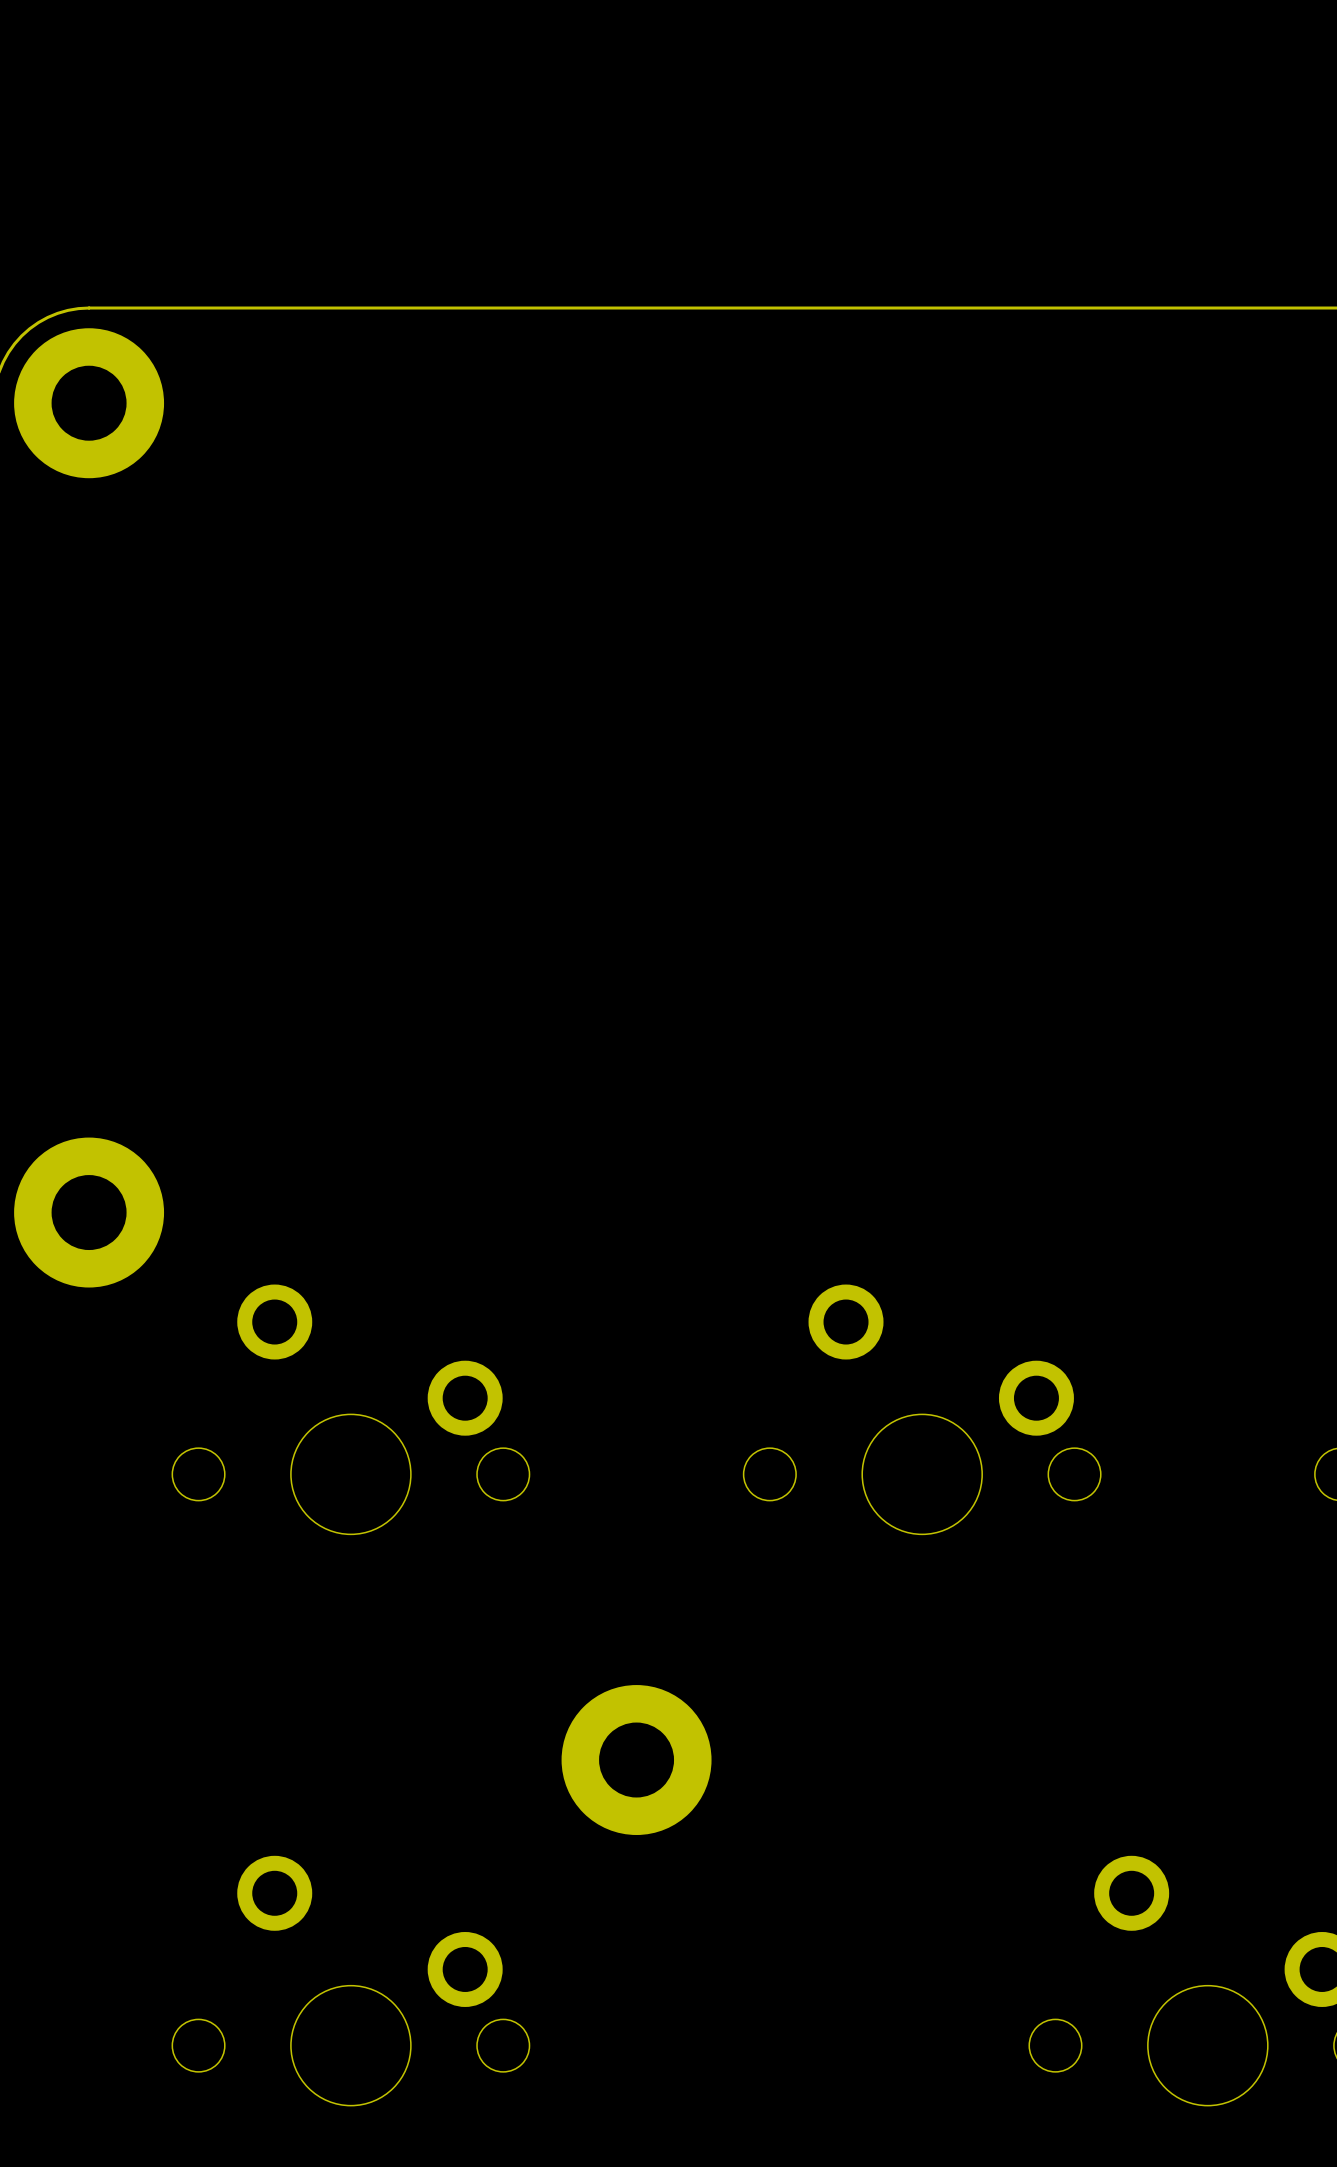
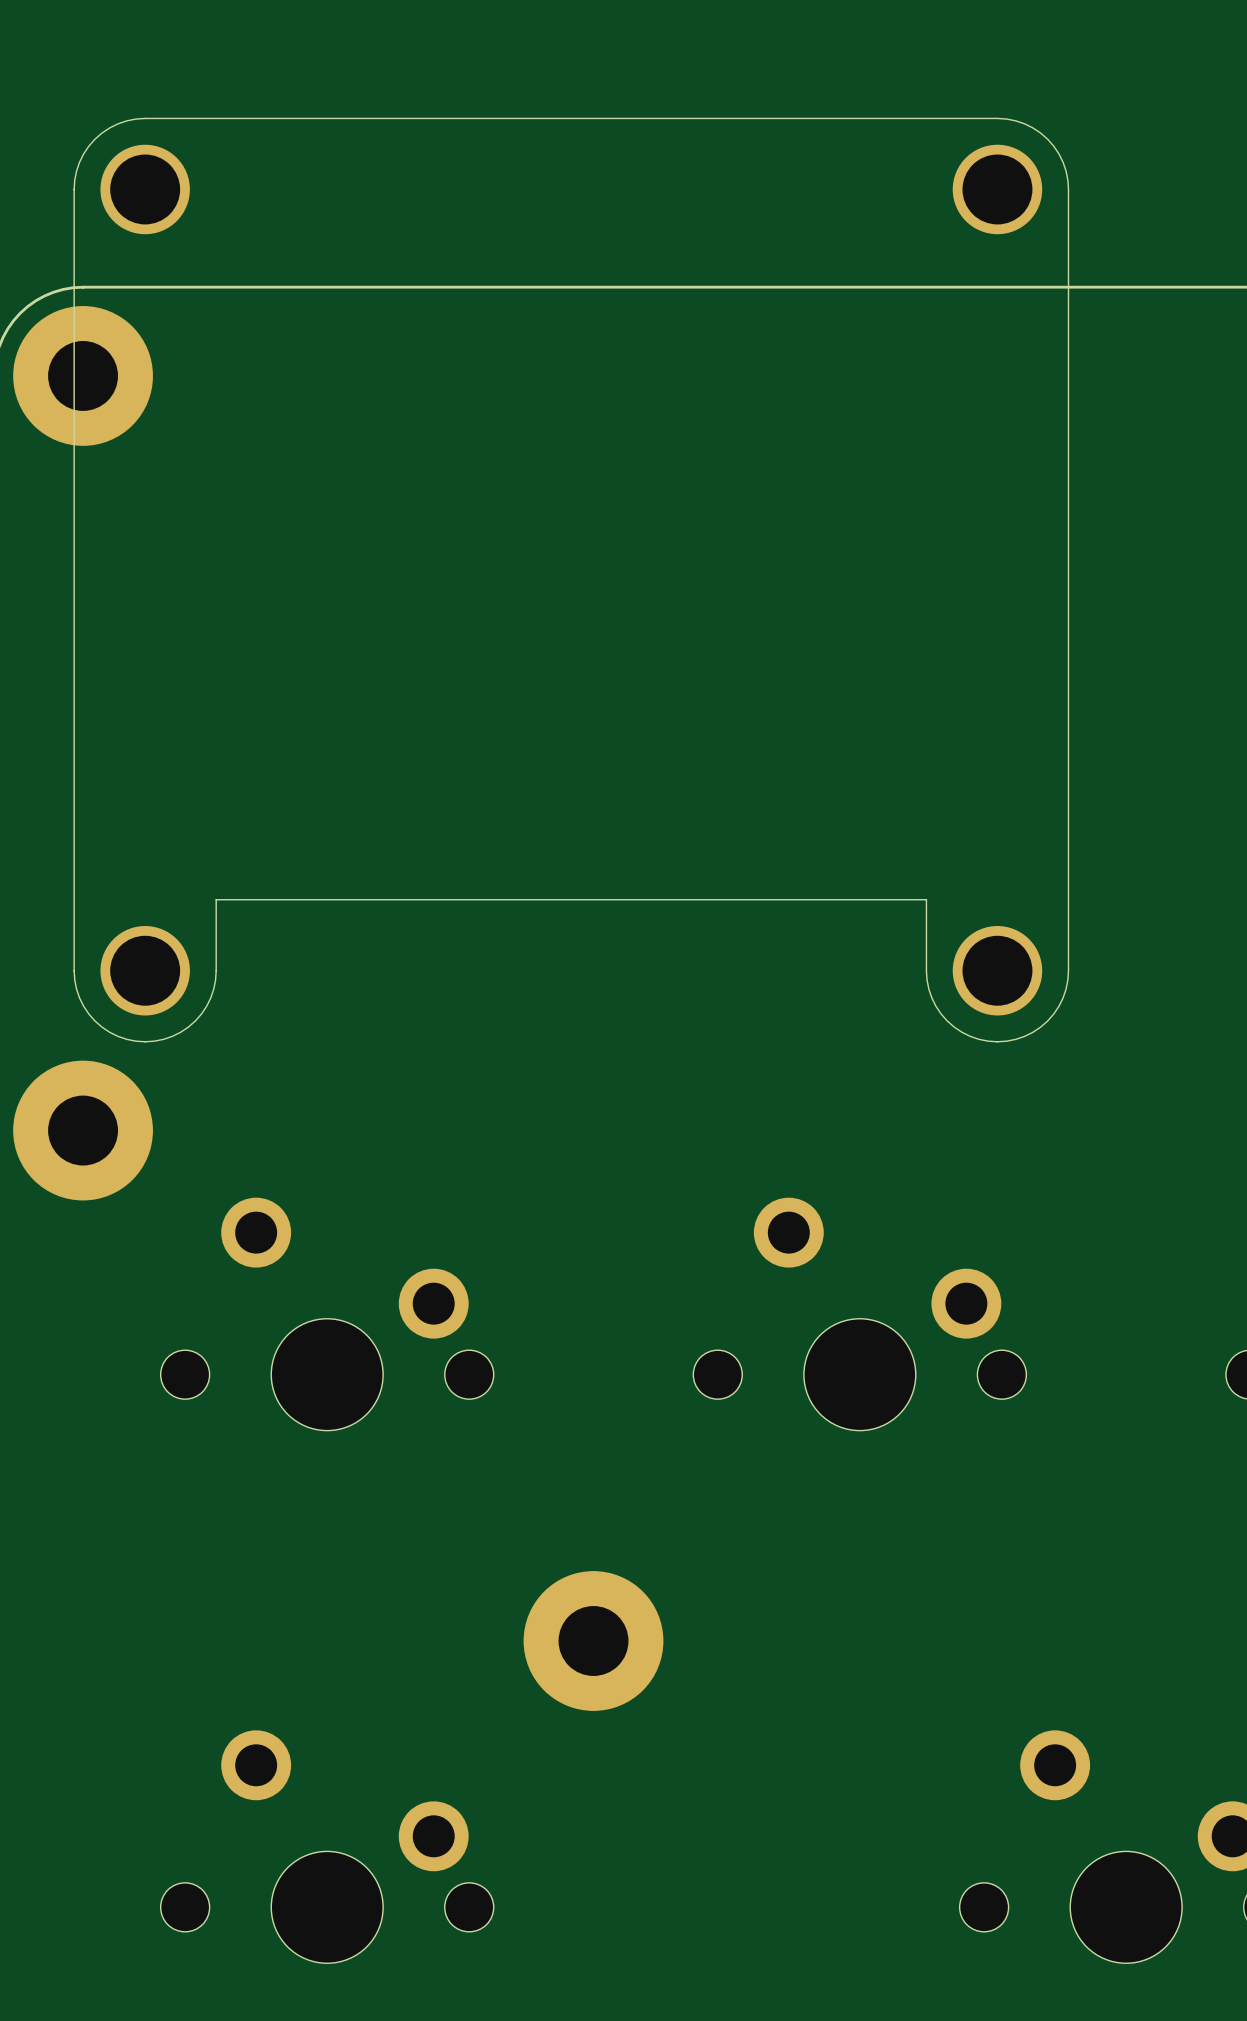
board edge: none -> (997, 118) (145, 118) (117, 123) (94, 139) (79, 162) (74, 189) (74, 970) (79, 997) (94, 1020) (117, 1036) (145, 1041) (172, 1036) (195, 1020) (206, 1006) (215, 980) (216, 899) (926, 899) (927, 980) (931, 997) (947, 1020) (970, 1036) (997, 1041) (1024, 1036) (1047, 1020) (1063, 997) (1068, 970) (1068, 189) (1063, 162) (1047, 139) (1024, 123) (997, 118)
part: none -> (145, 189)
part: none -> (997, 189)
part: none -> (145, 970)
part: none -> (997, 970)

